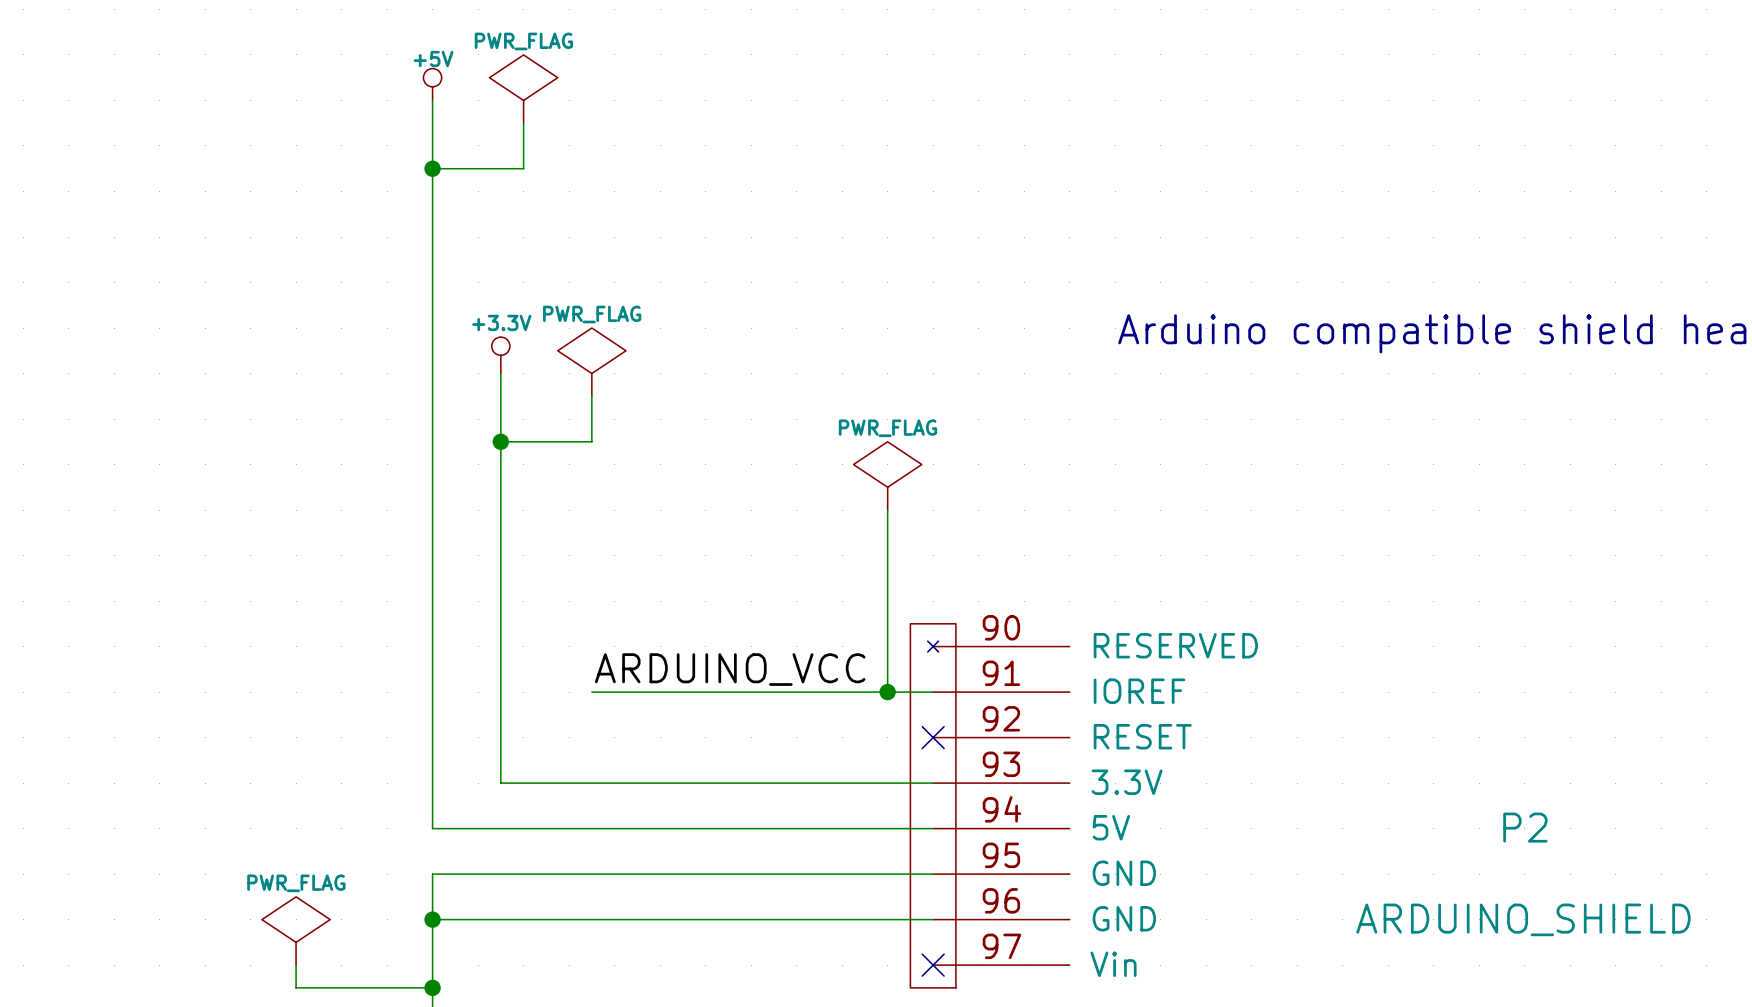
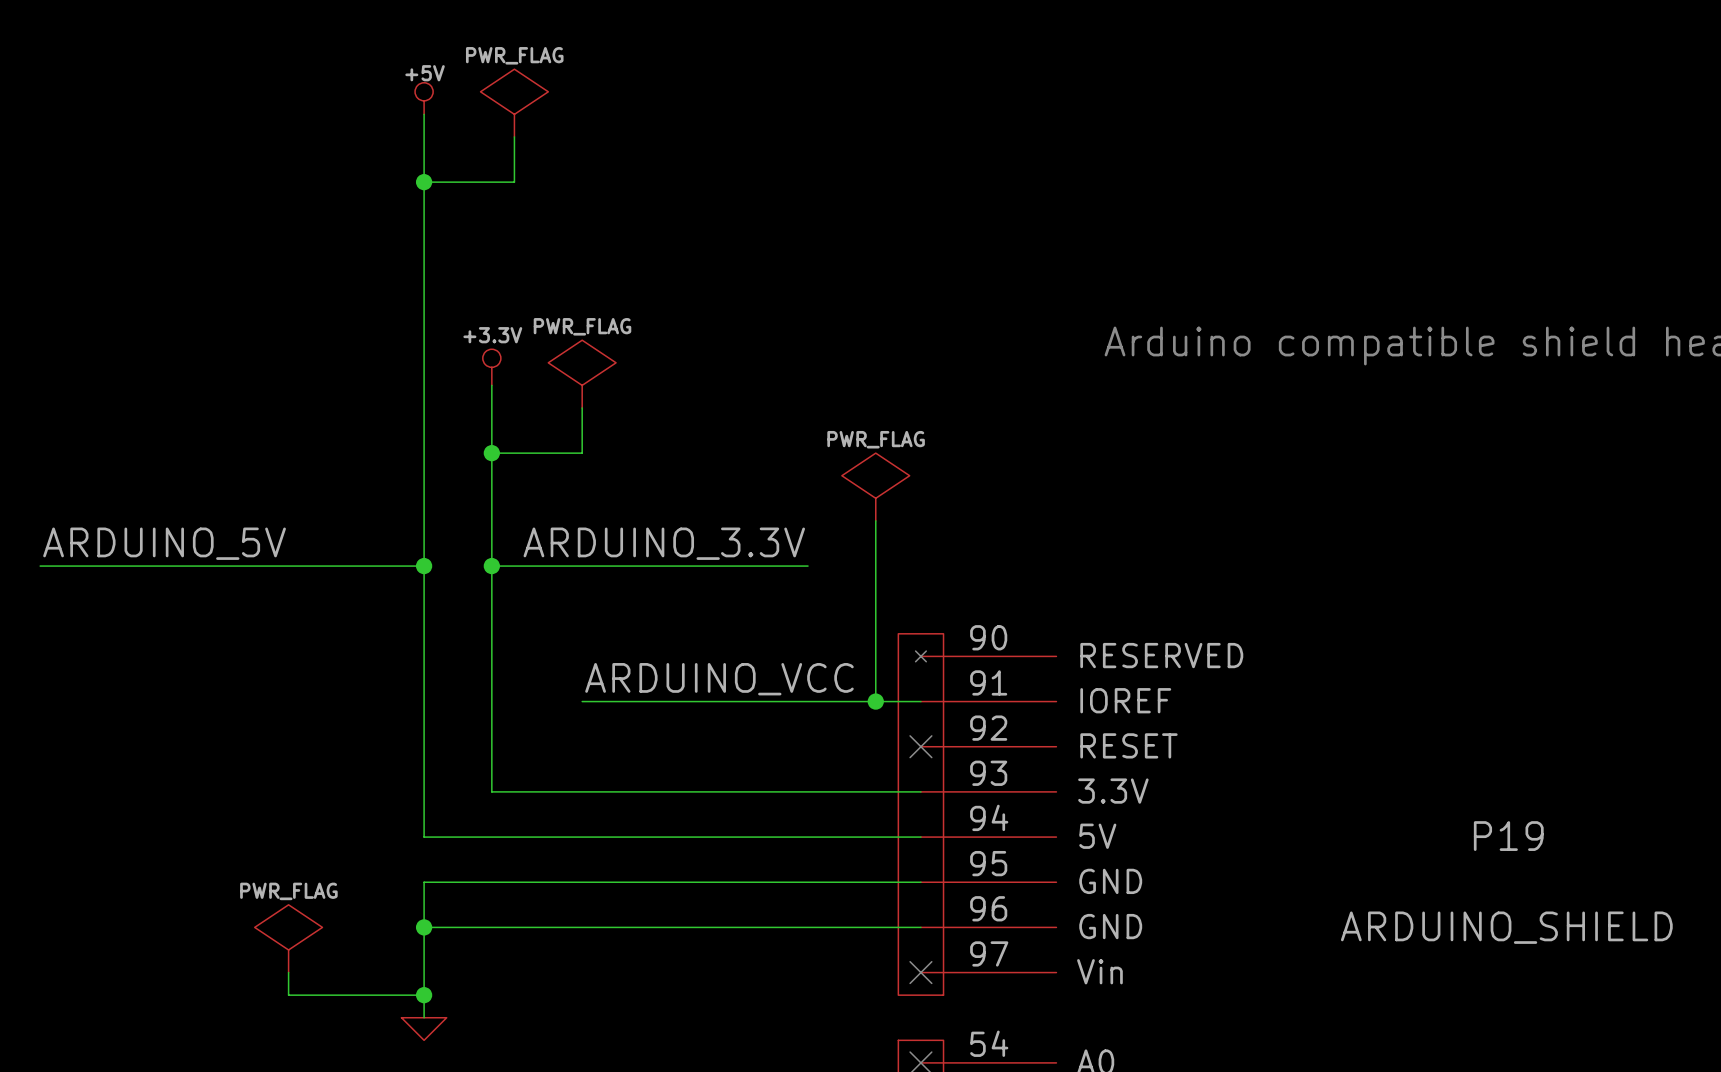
label: none -> ARDUINO_5V (164, 543)
label: none -> ARDUINO_3.3V (664, 543)
wire: none -> (40, 566) (424, 566)
junction: none -> (424, 566)
wire: none -> (491, 566) (808, 566)
junction: none -> (491, 566)
P2 name: P2 (1525, 827) -> P19 (1508, 836)

